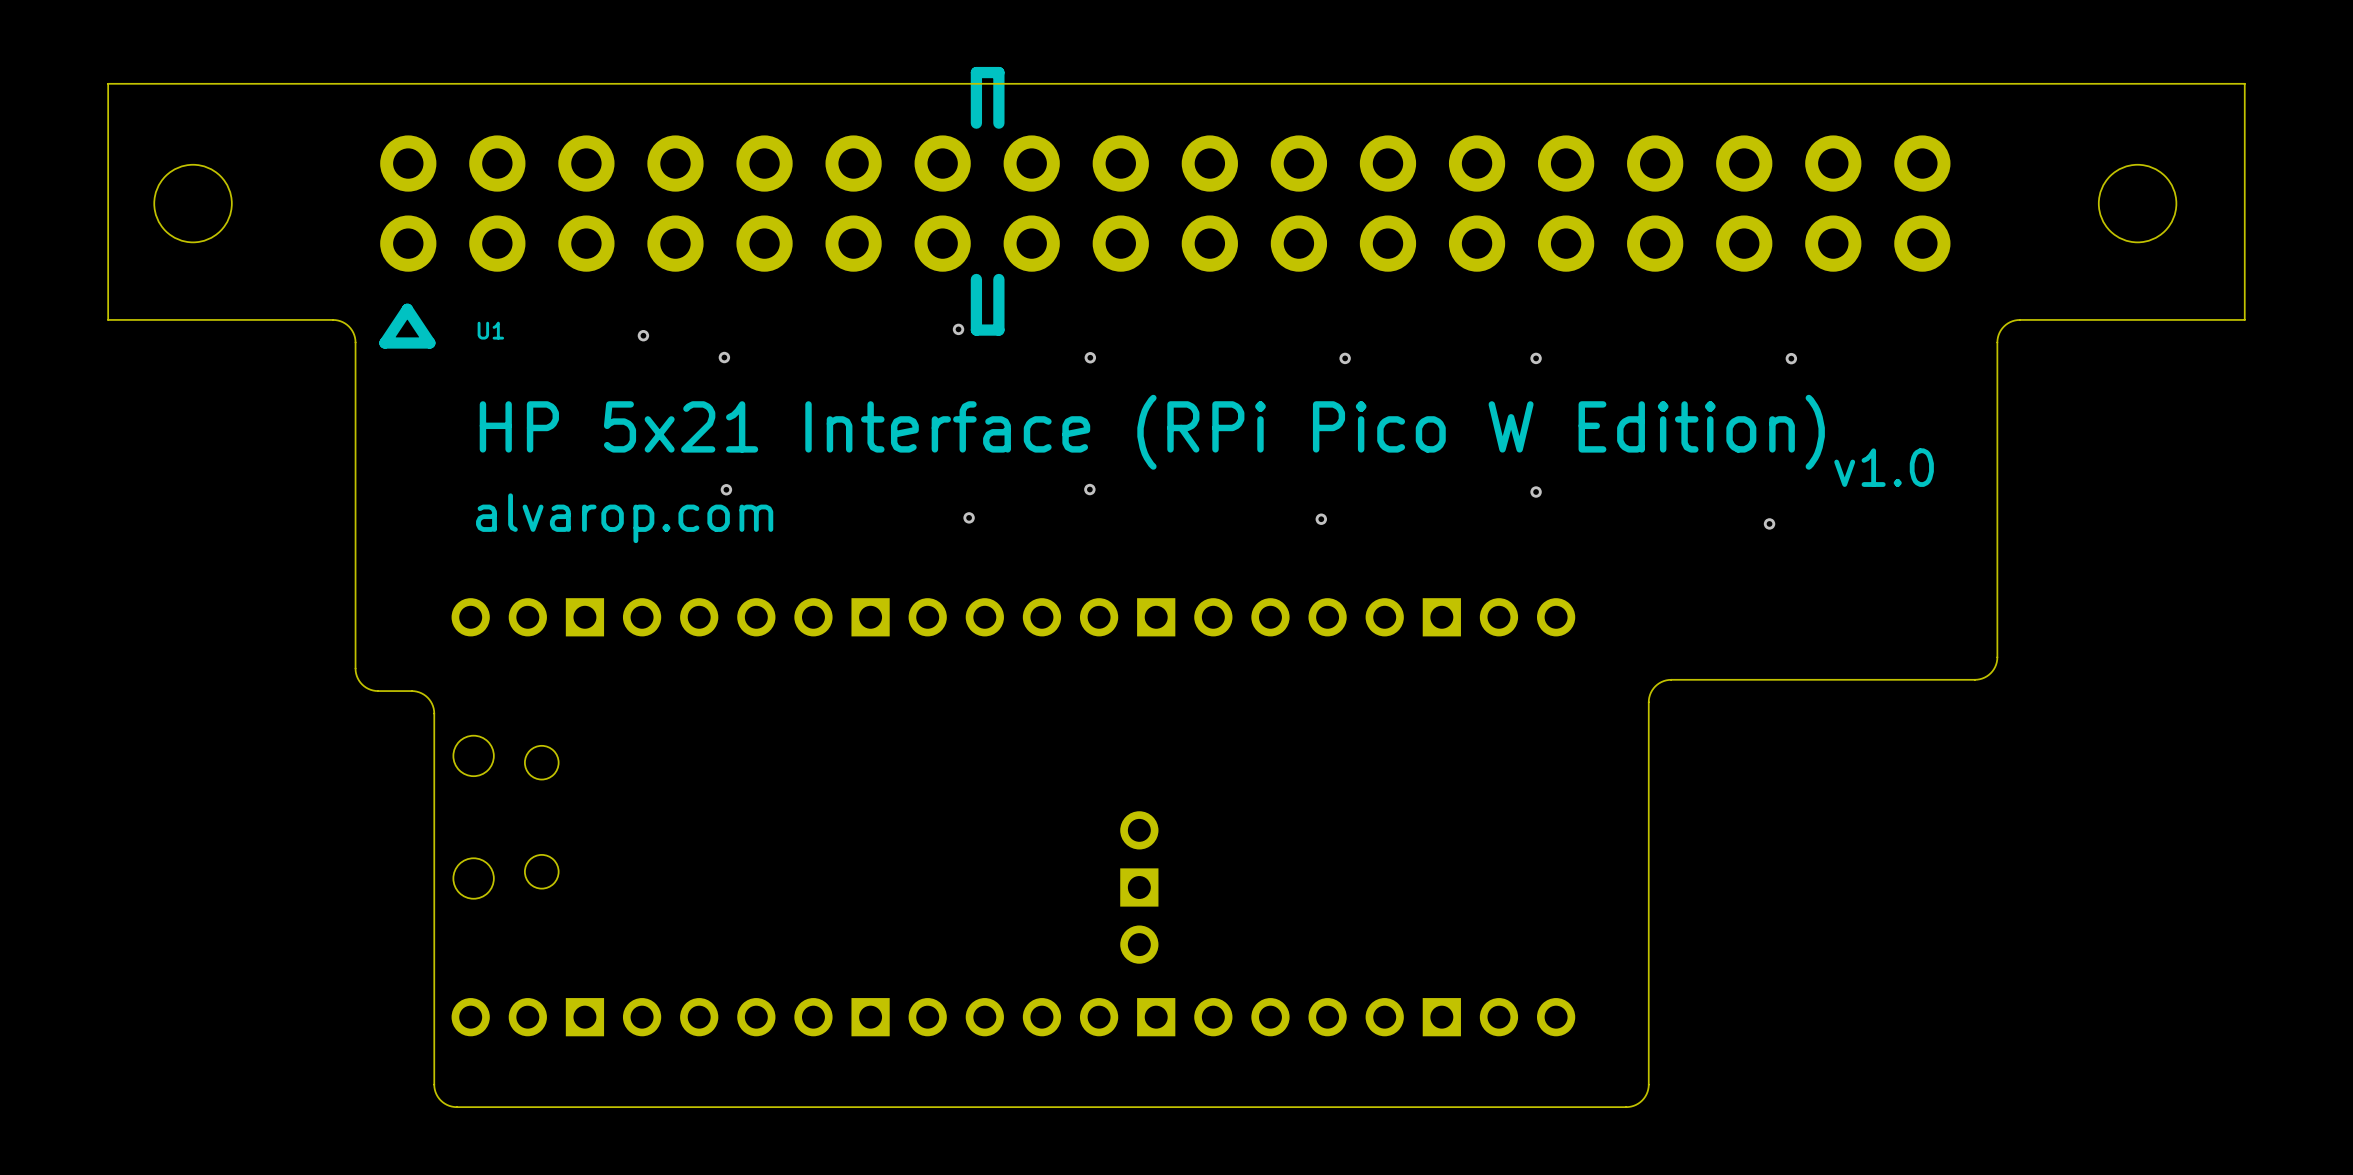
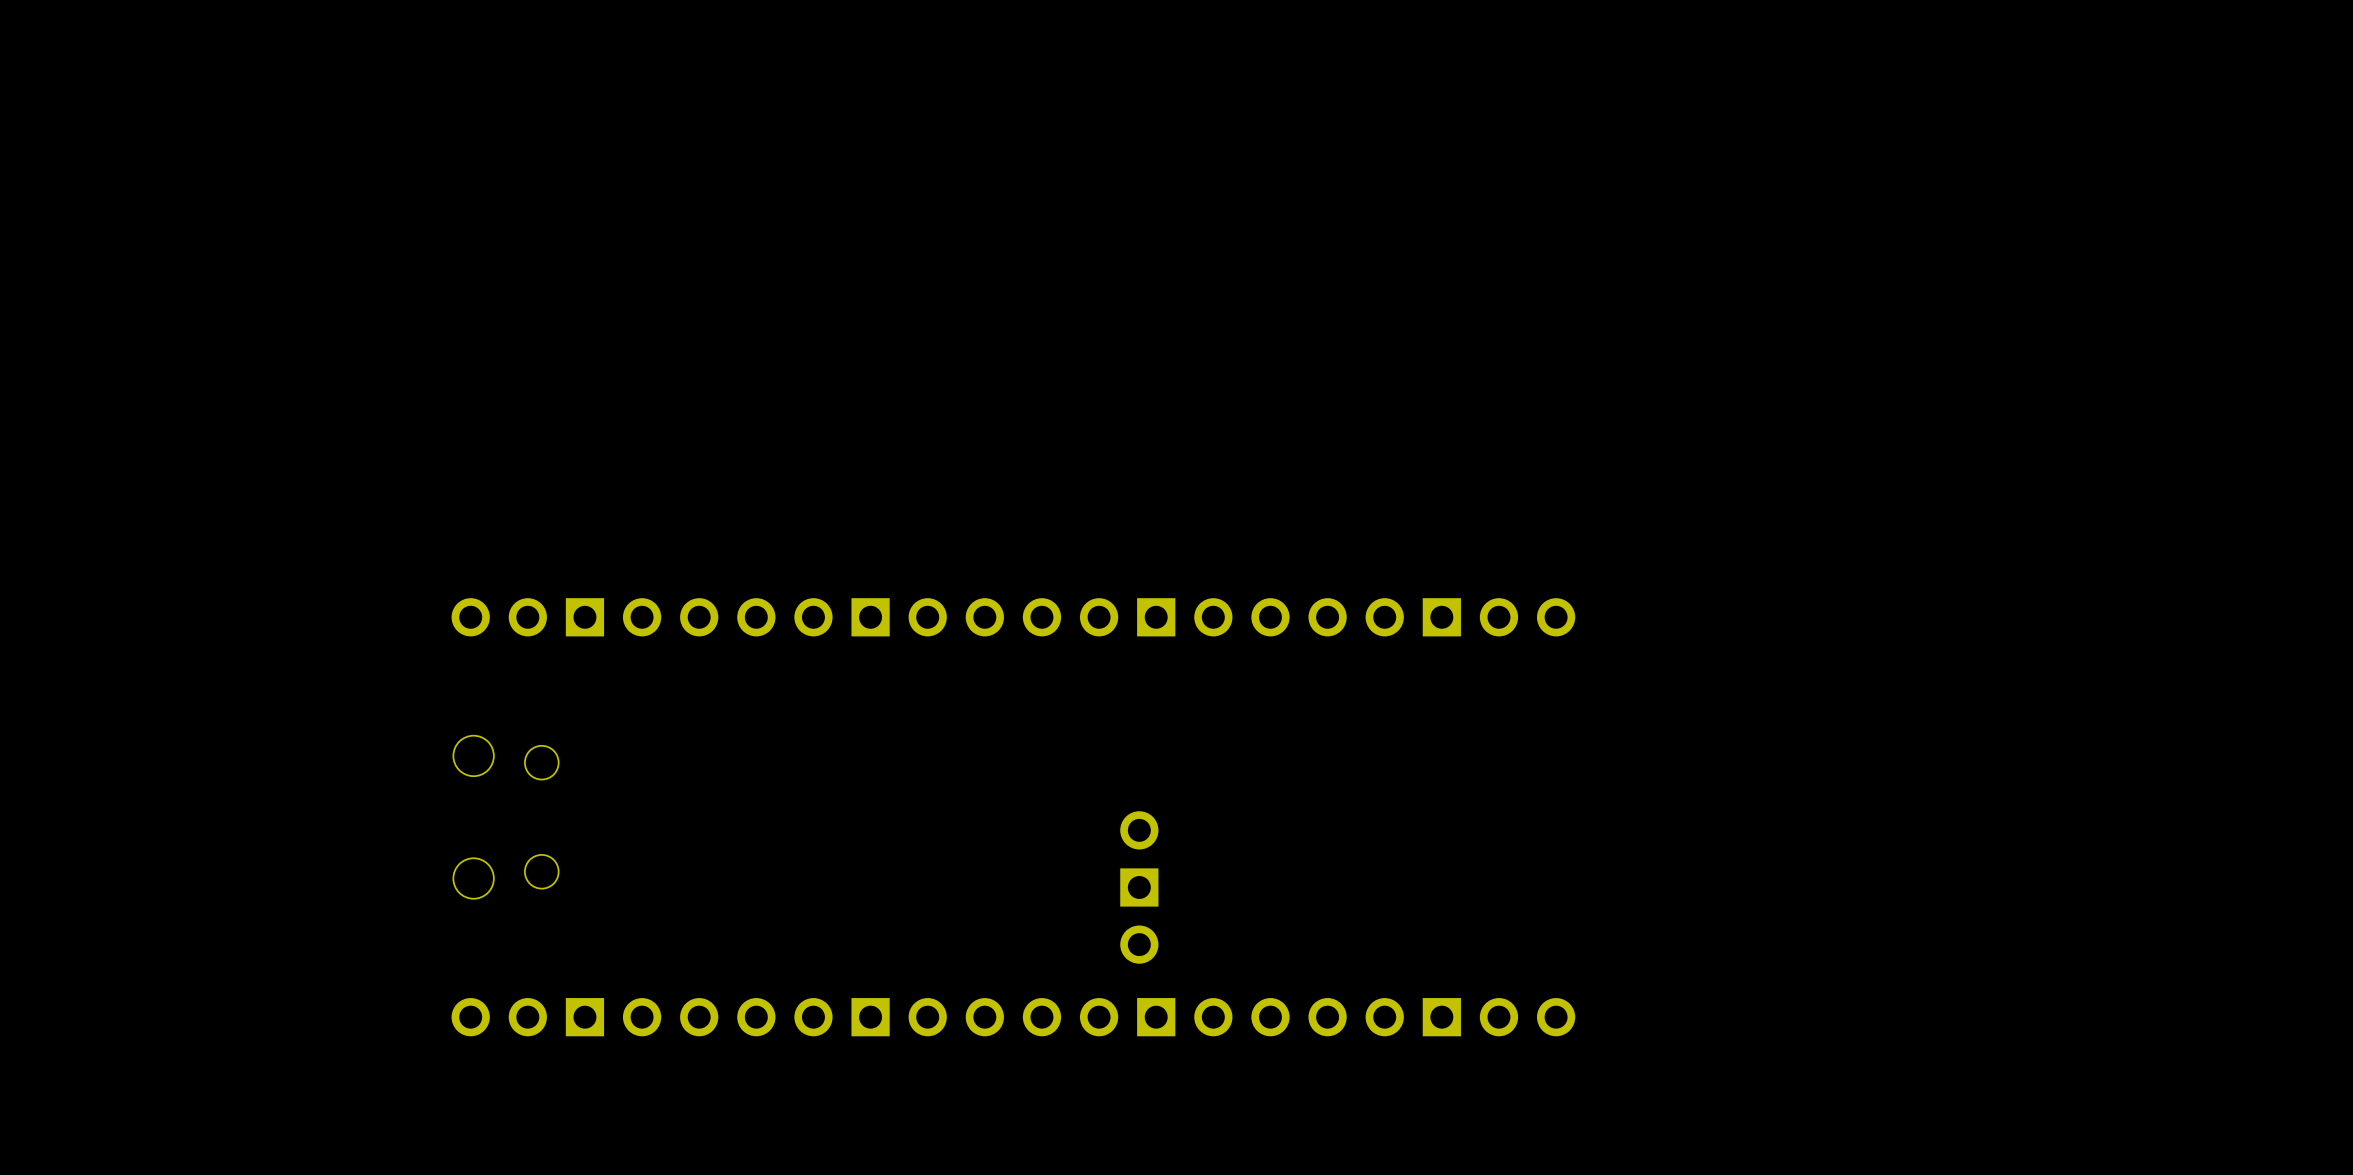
board edge: (2244, 83) (2244, 319) (2019, 319) (2007, 323) (1999, 332) (1997, 342) (1997, 657) (1996, 664) (1990, 673) (1982, 678) (1974, 679) (1671, 679) (1661, 682) (1652, 690) (1648, 702) (1648, 1087) (1642, 1100) (1628, 1106) (456, 1107) (446, 1104) (437, 1096) (434, 1084) (433, 708) (429, 699) (419, 692) (375, 690) (368, 688) (358, 680) (355, 671) (355, 342) (353, 332) (345, 323) (333, 319) (108, 319) (108, 83) (2244, 83) -> none
U1: (1165, 207) -> none
via: (958, 329) -> none
via: (643, 335) -> none
via: (724, 357) -> none
via: (1090, 357) -> none
via: (1345, 358) -> none
via: (1536, 358) -> none
via: (1791, 358) -> none
text: HP 5x21 Interface (RPi Pico W Edition) (1152, 432) -> none
text: v1.0 (1884, 467) -> none
via: (726, 489) -> none
via: (1089, 489) -> none
via: (1536, 492) -> none
via: (969, 517) -> none
text: alvarop.com (624, 518) -> none
via: (1321, 519) -> none
via: (1769, 523) -> none

